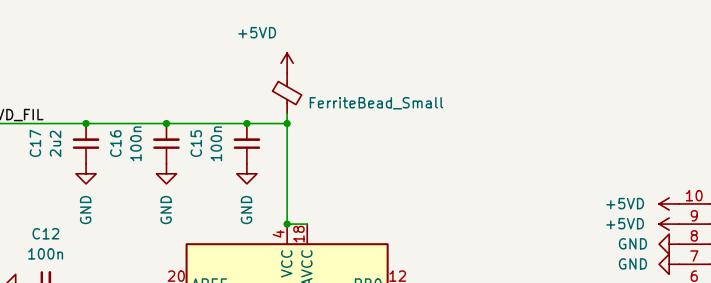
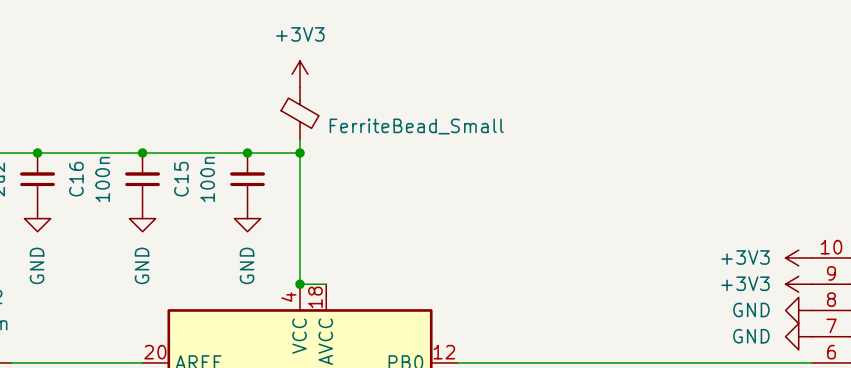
power symbol: +5VD (287, 63) -> +3V3 (300, 74)
power symbol: +5VD (669, 203) -> +3V3 (798, 257)
power symbol: +5VD (669, 224) -> +3V3 (798, 284)

